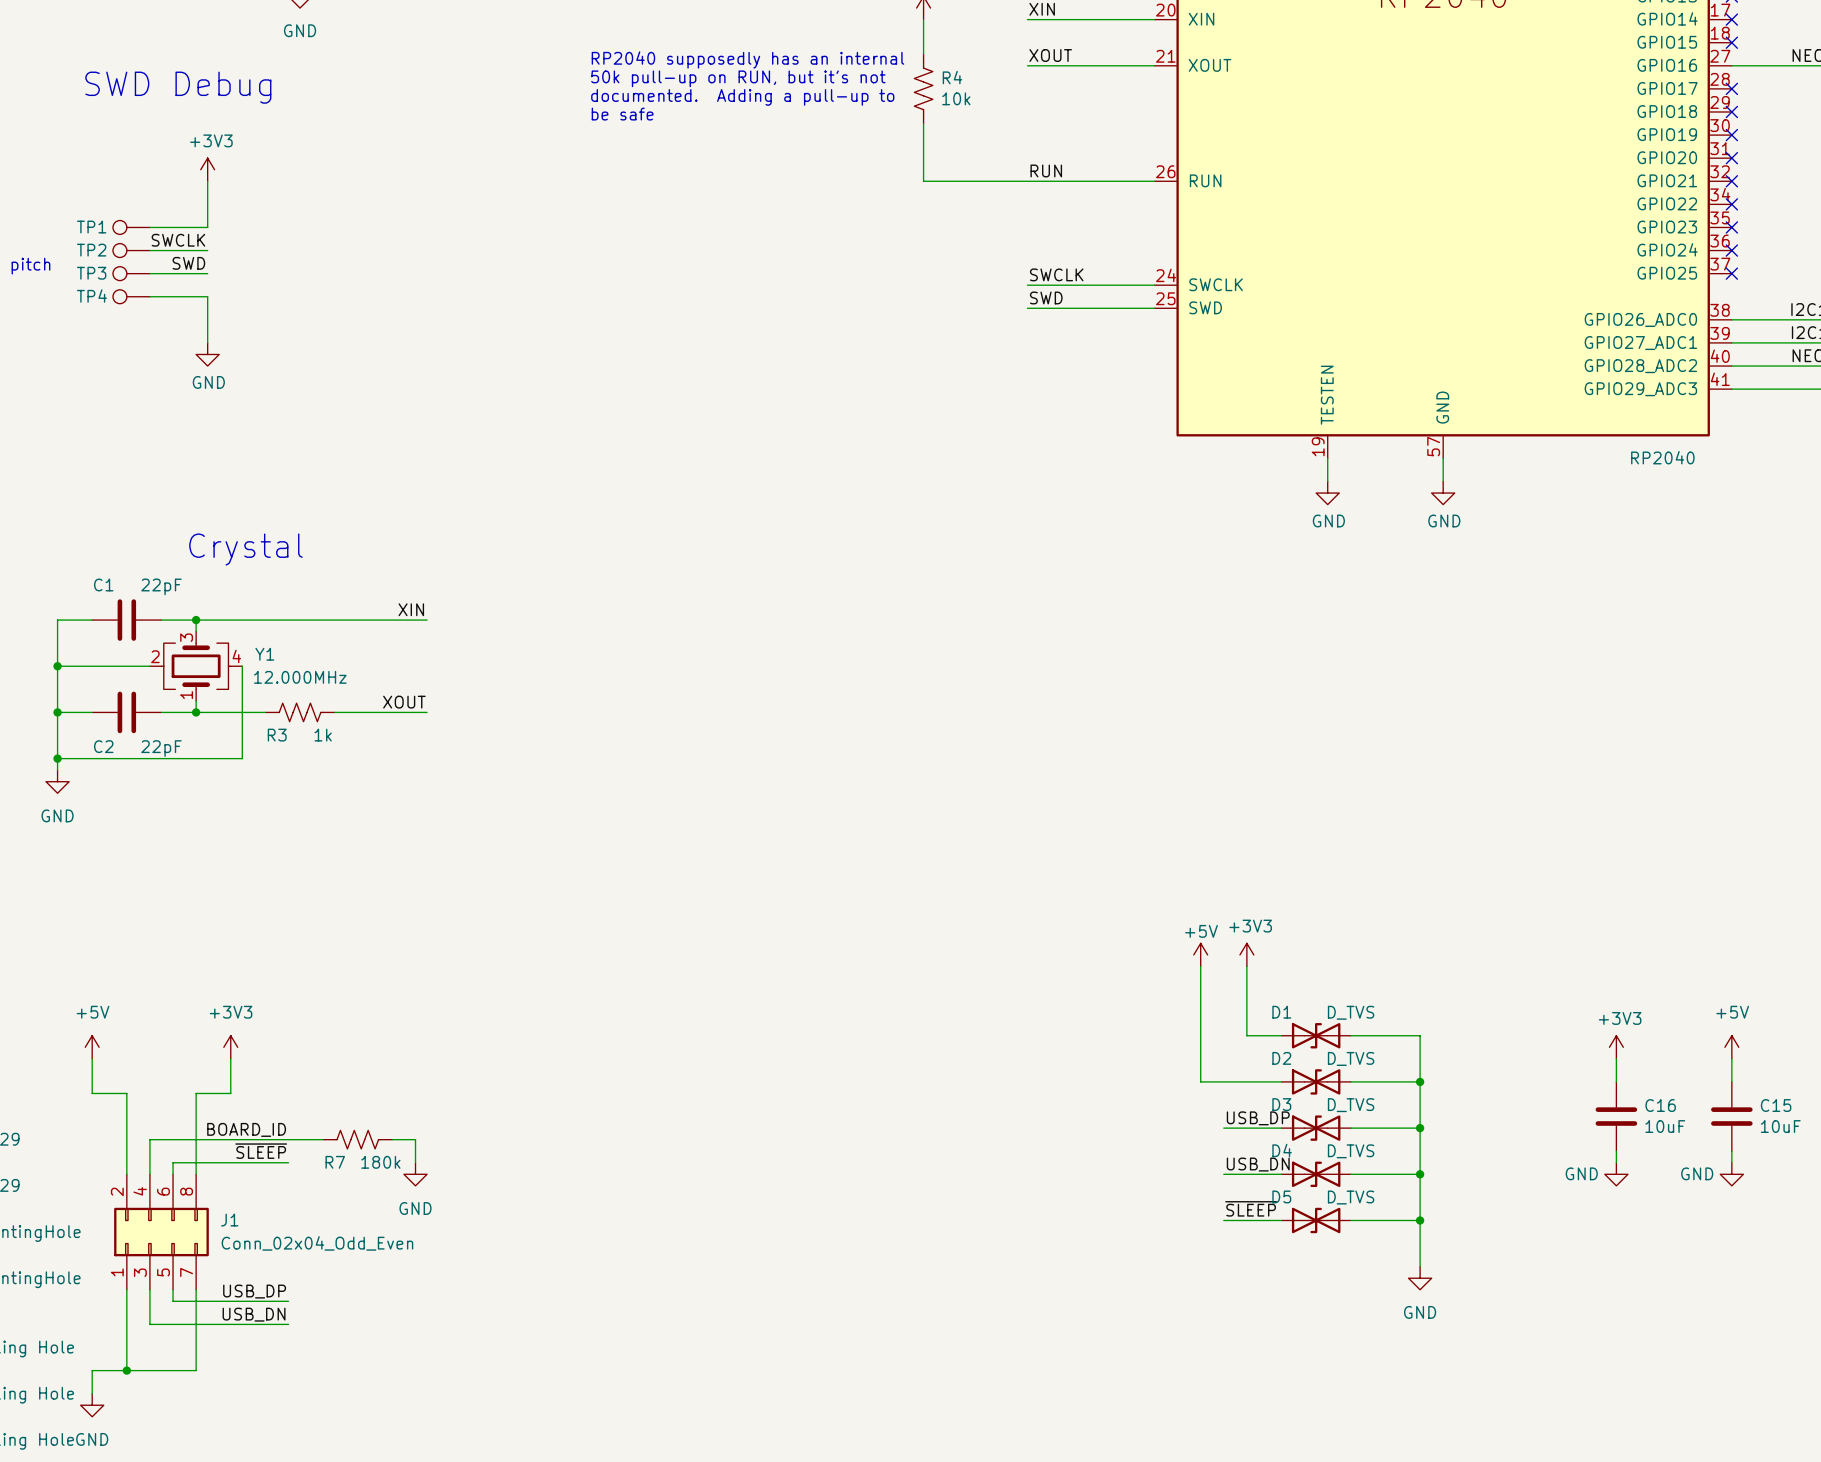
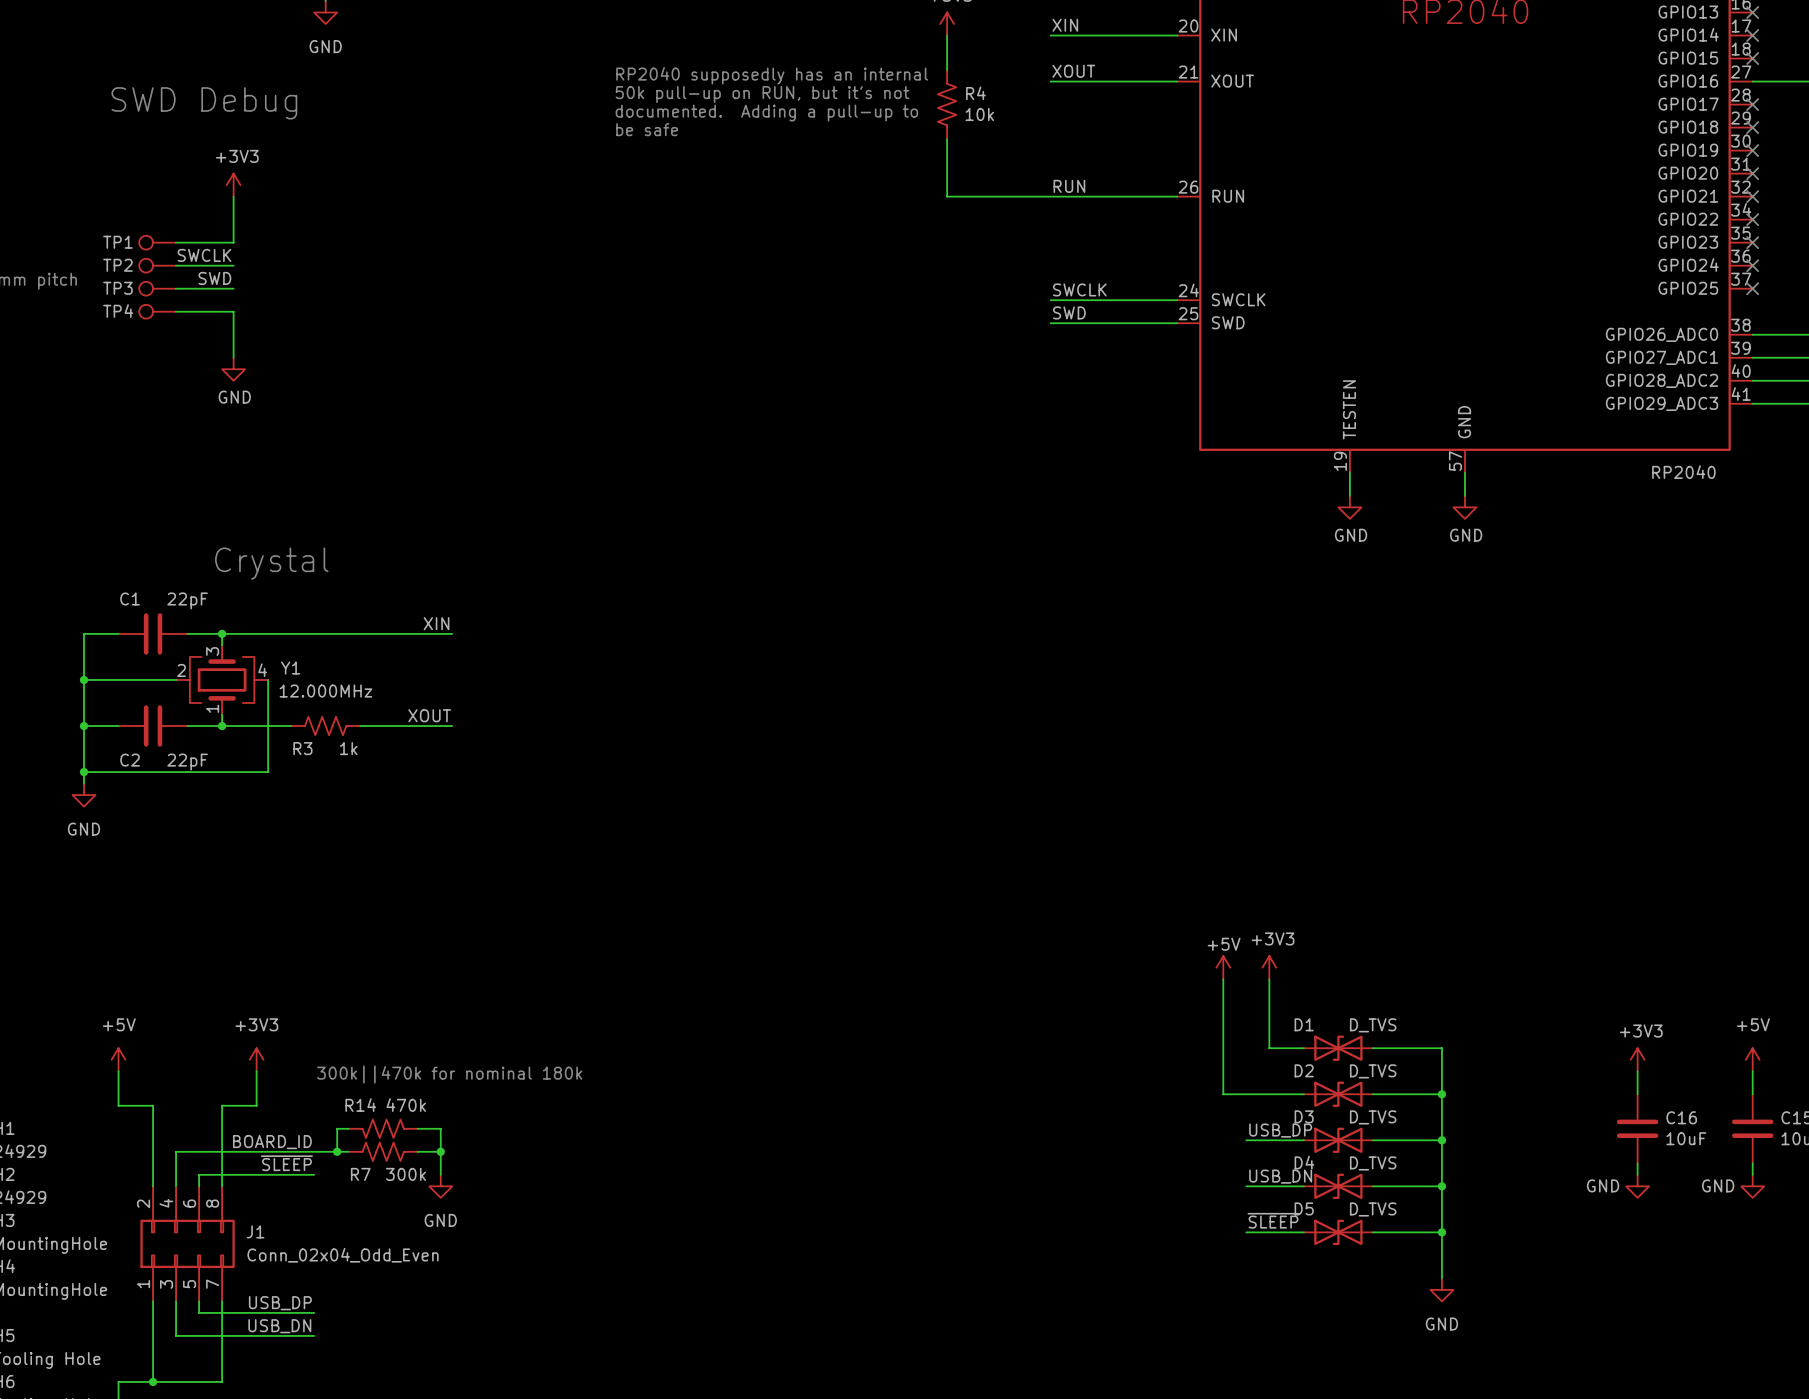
text: none -> 300k||470k for nominal 180k (449, 1074)
wire: none -> (348, 1128) (337, 1128) (337, 1151)
R14: none -> 470k (383, 1128)
wire: none -> (417, 1128) (440, 1128) (440, 1151)
junction: none -> (337, 1151)
junction: none -> (440, 1151)
R7 value: 180k (380, 1162) -> 300k (405, 1174)

